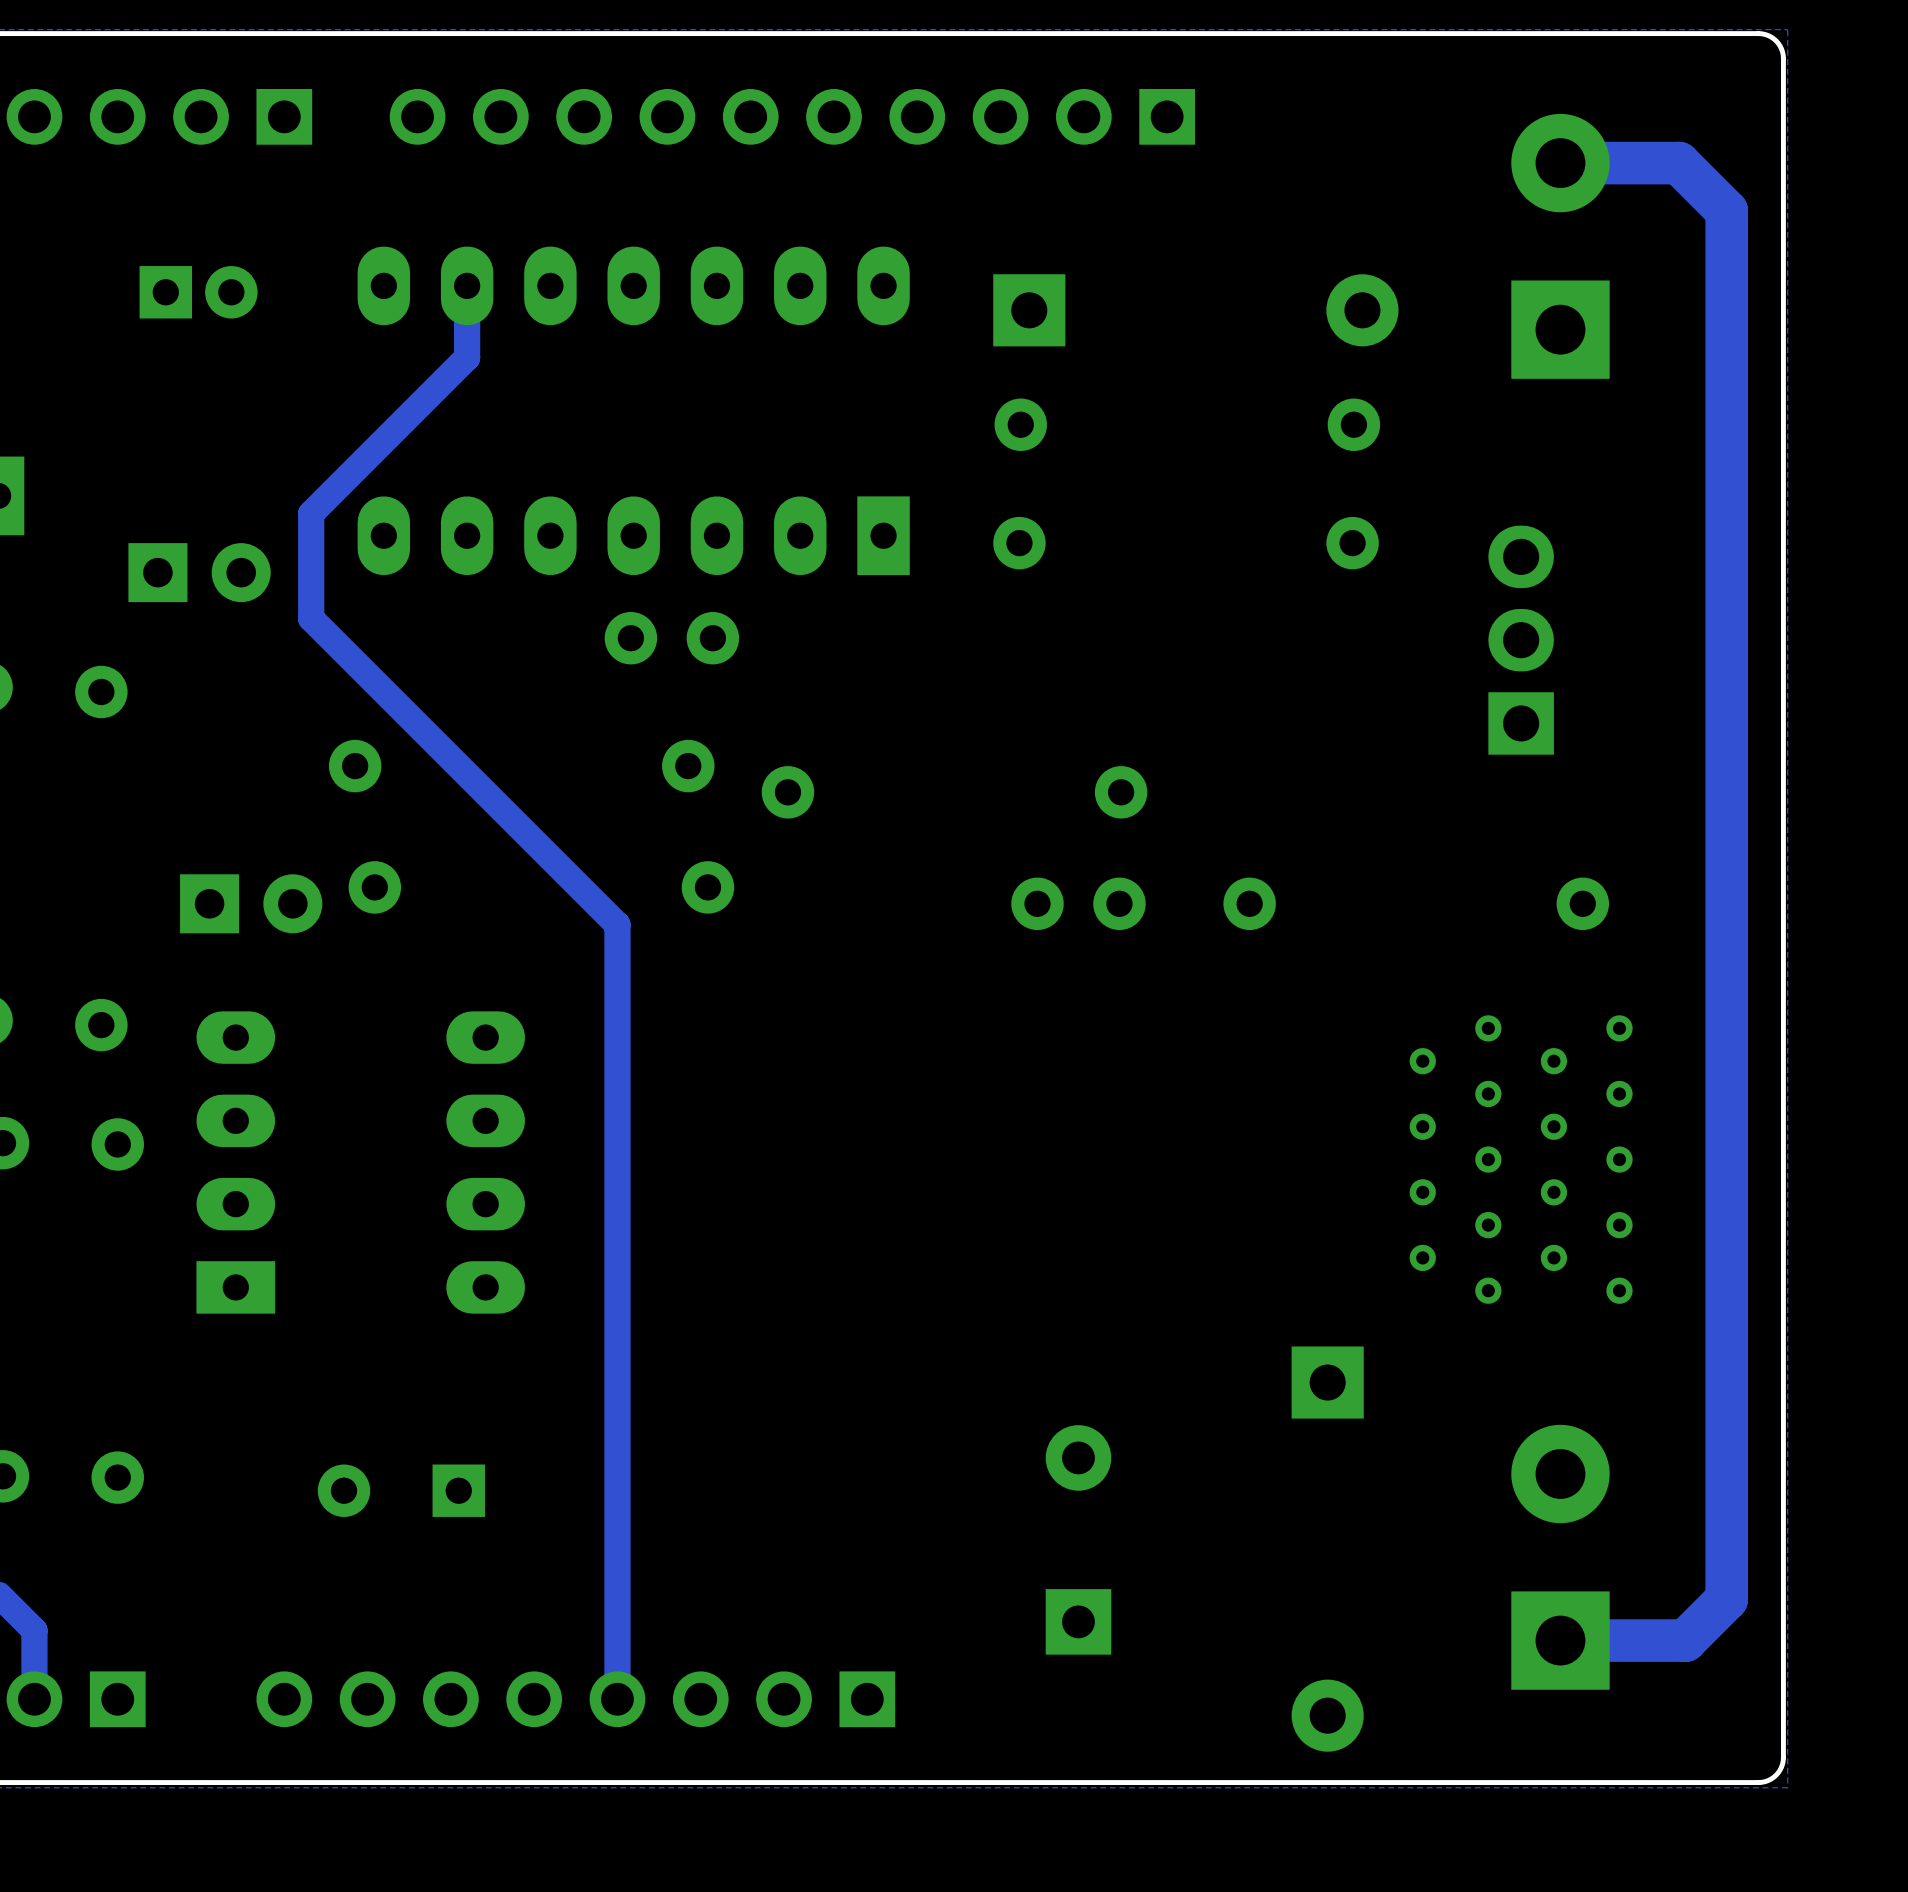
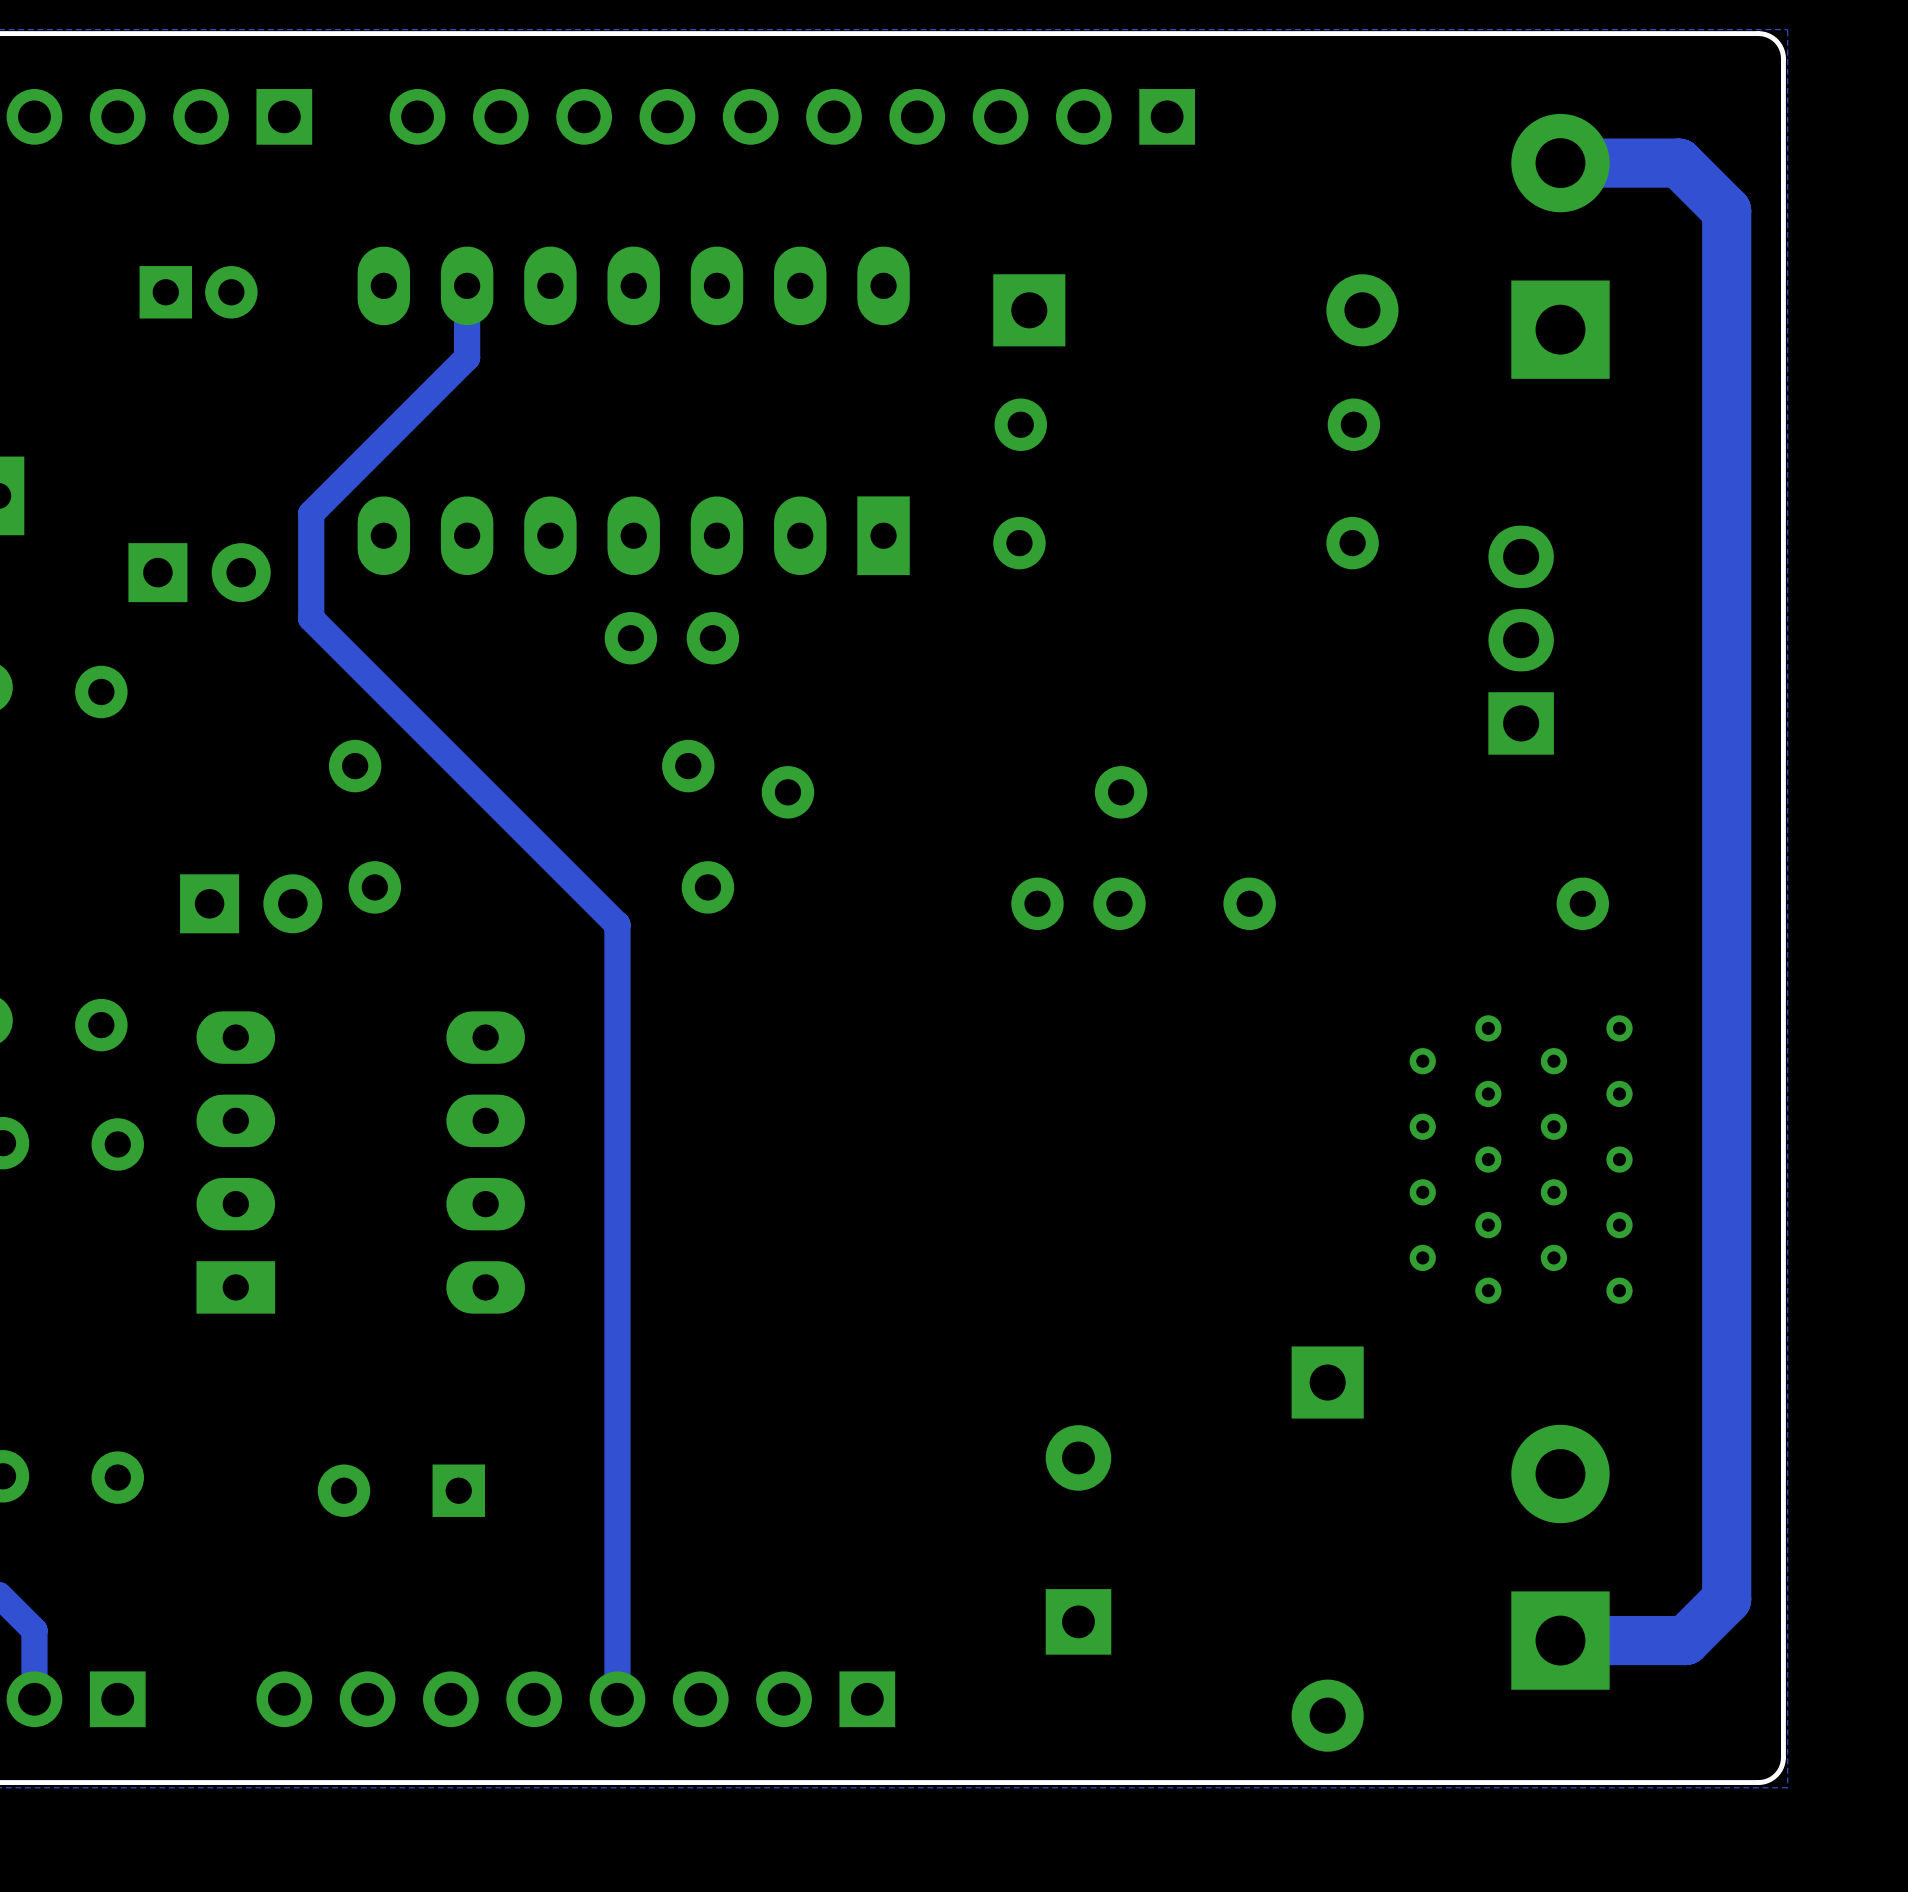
track width: thin (1560, 163) (1678, 163) (1726, 210) (1726, 1599) (1685, 1640) (1560, 1640) -> thick (1560, 163) (1678, 163) (1726, 210) (1726, 1599) (1685, 1640) (1560, 1640)

